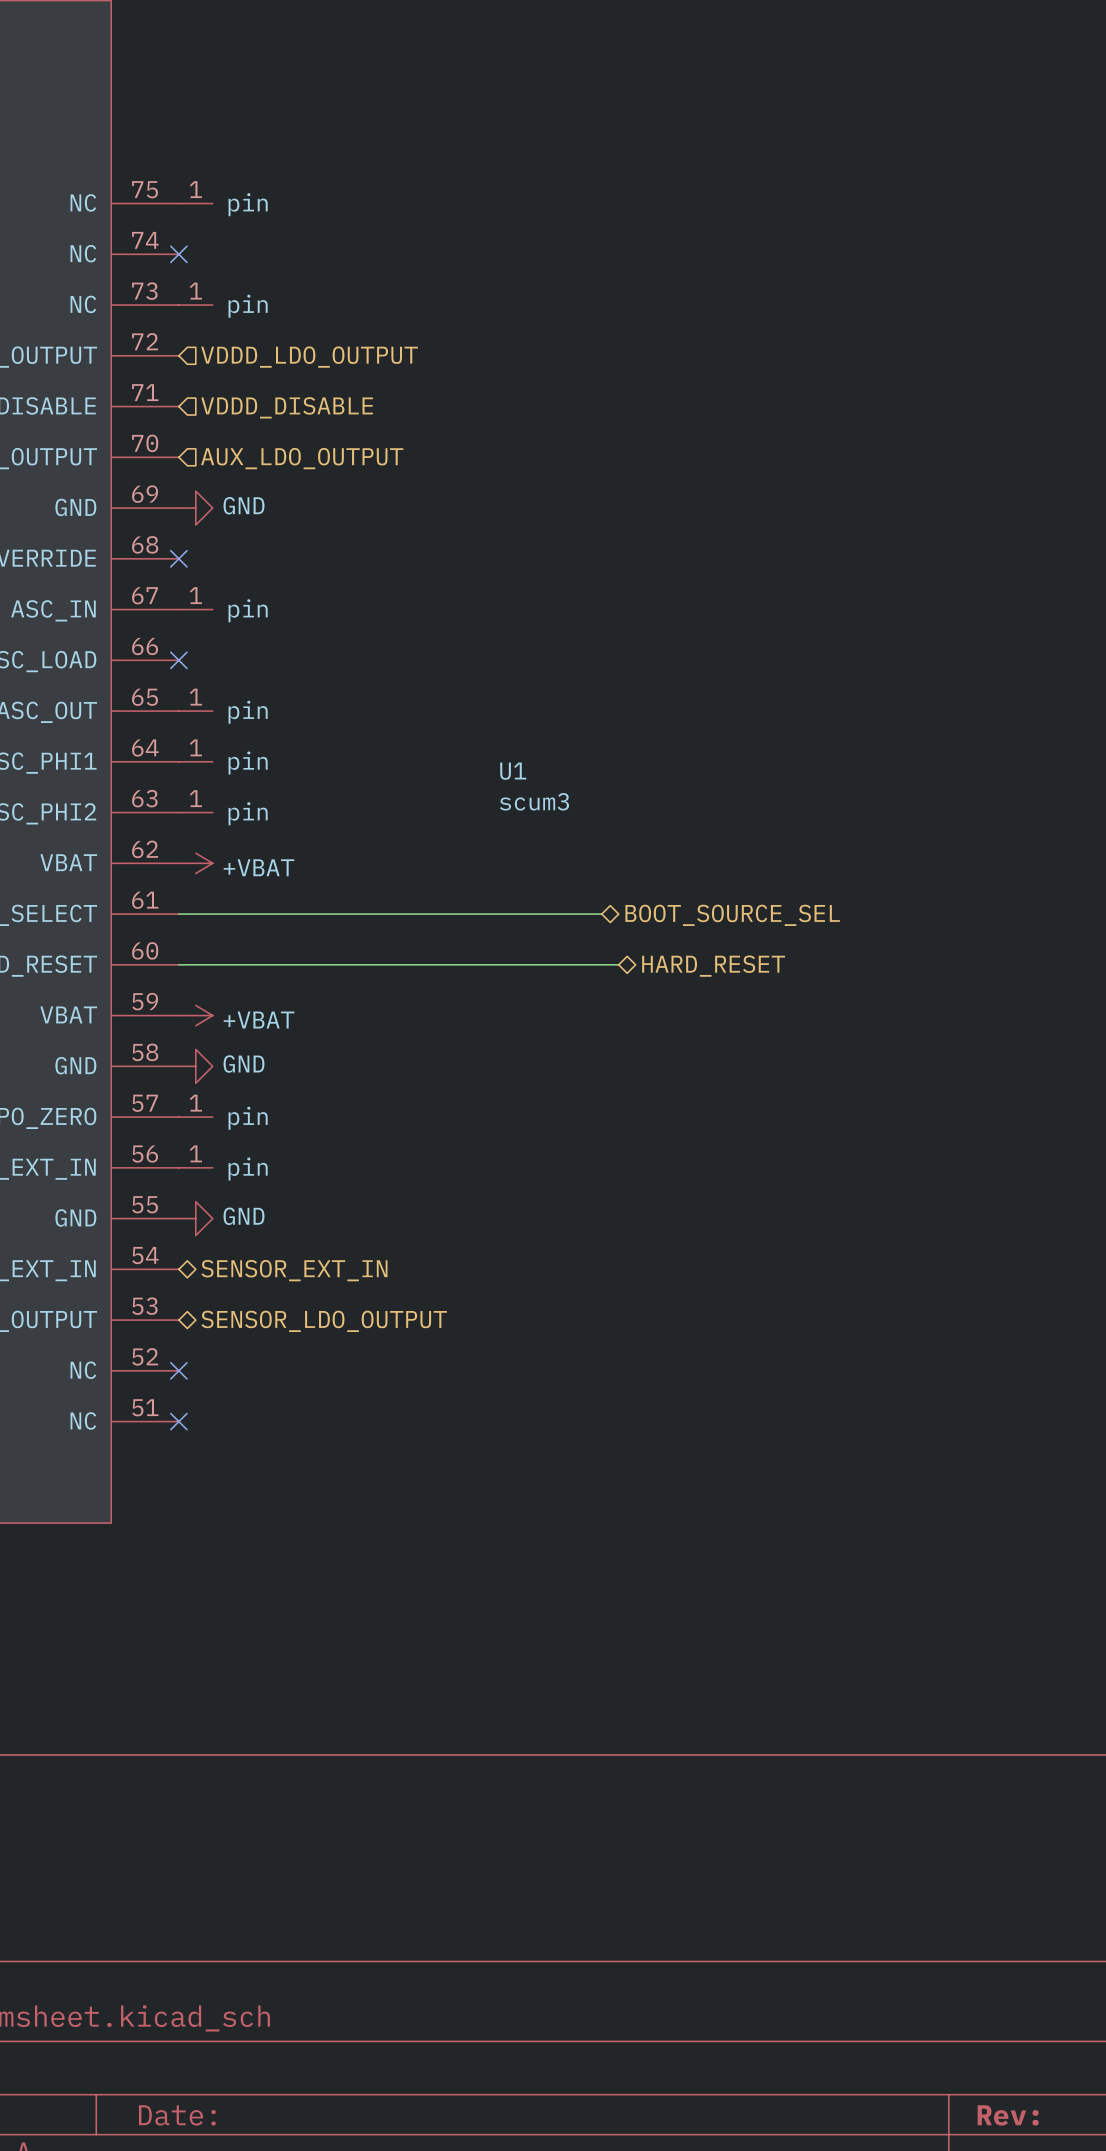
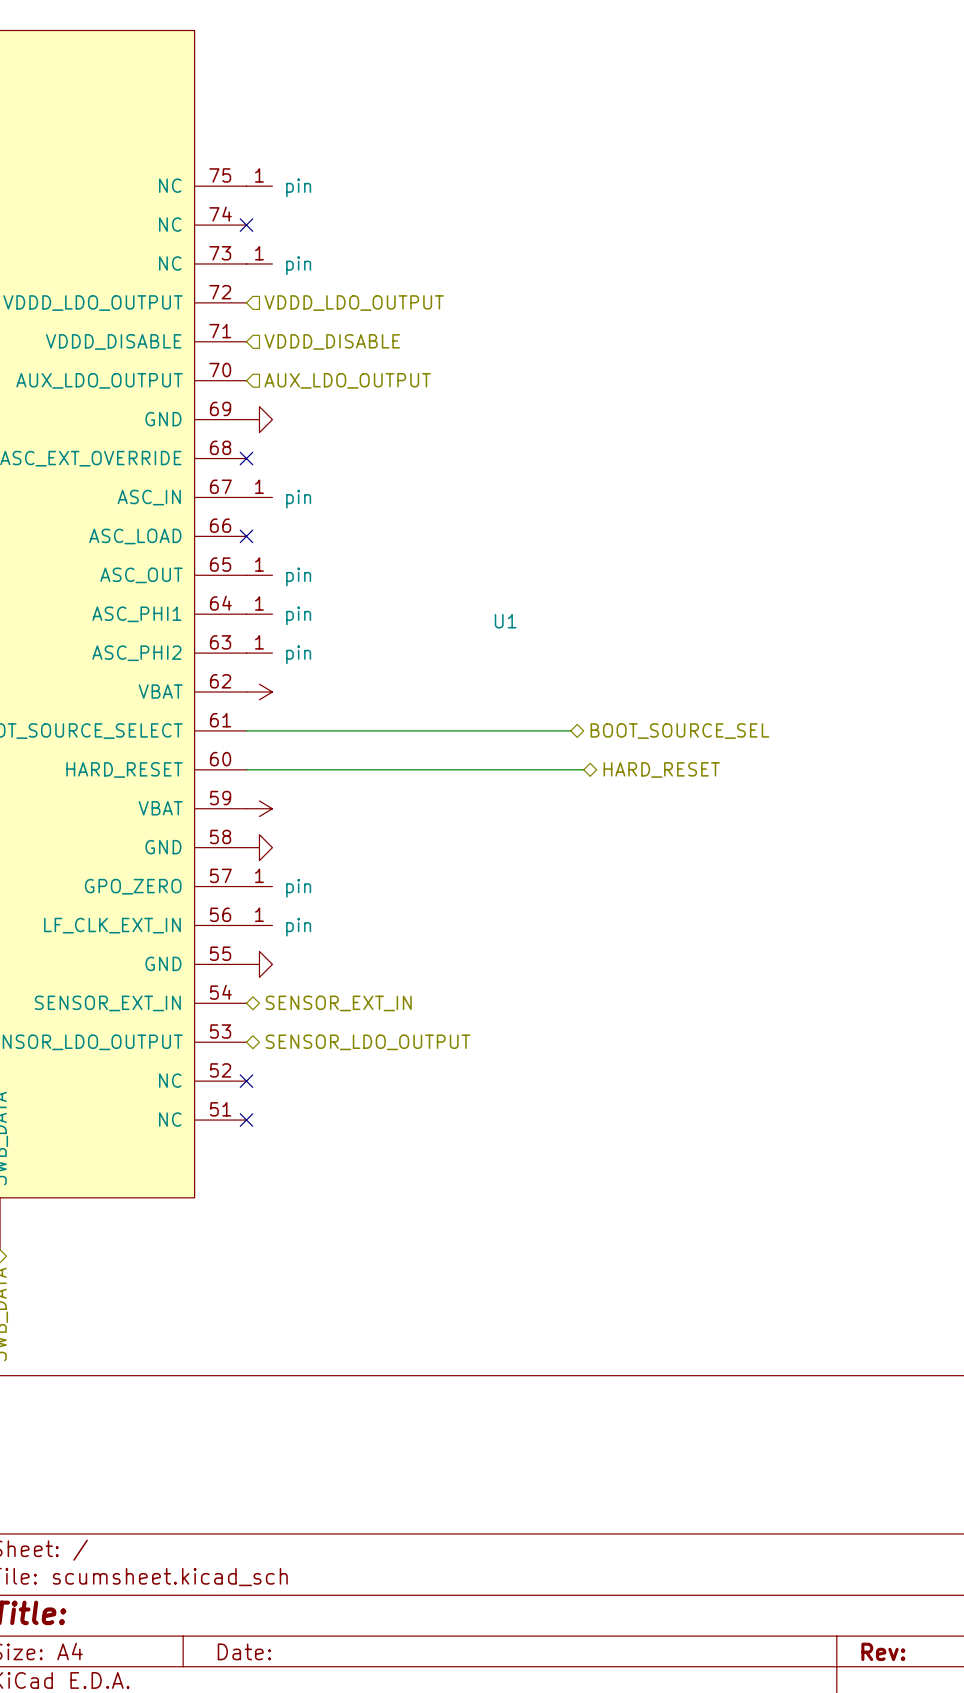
power symbol text: GND (244, 505) -> none
U1 value: scum3 (534, 801) -> none
power symbol text: +VBAT (259, 867) -> none
power symbol text: +VBAT (259, 1020) -> none
power symbol text: GND (244, 1064) -> none
power symbol text: GND (244, 1216) -> none

